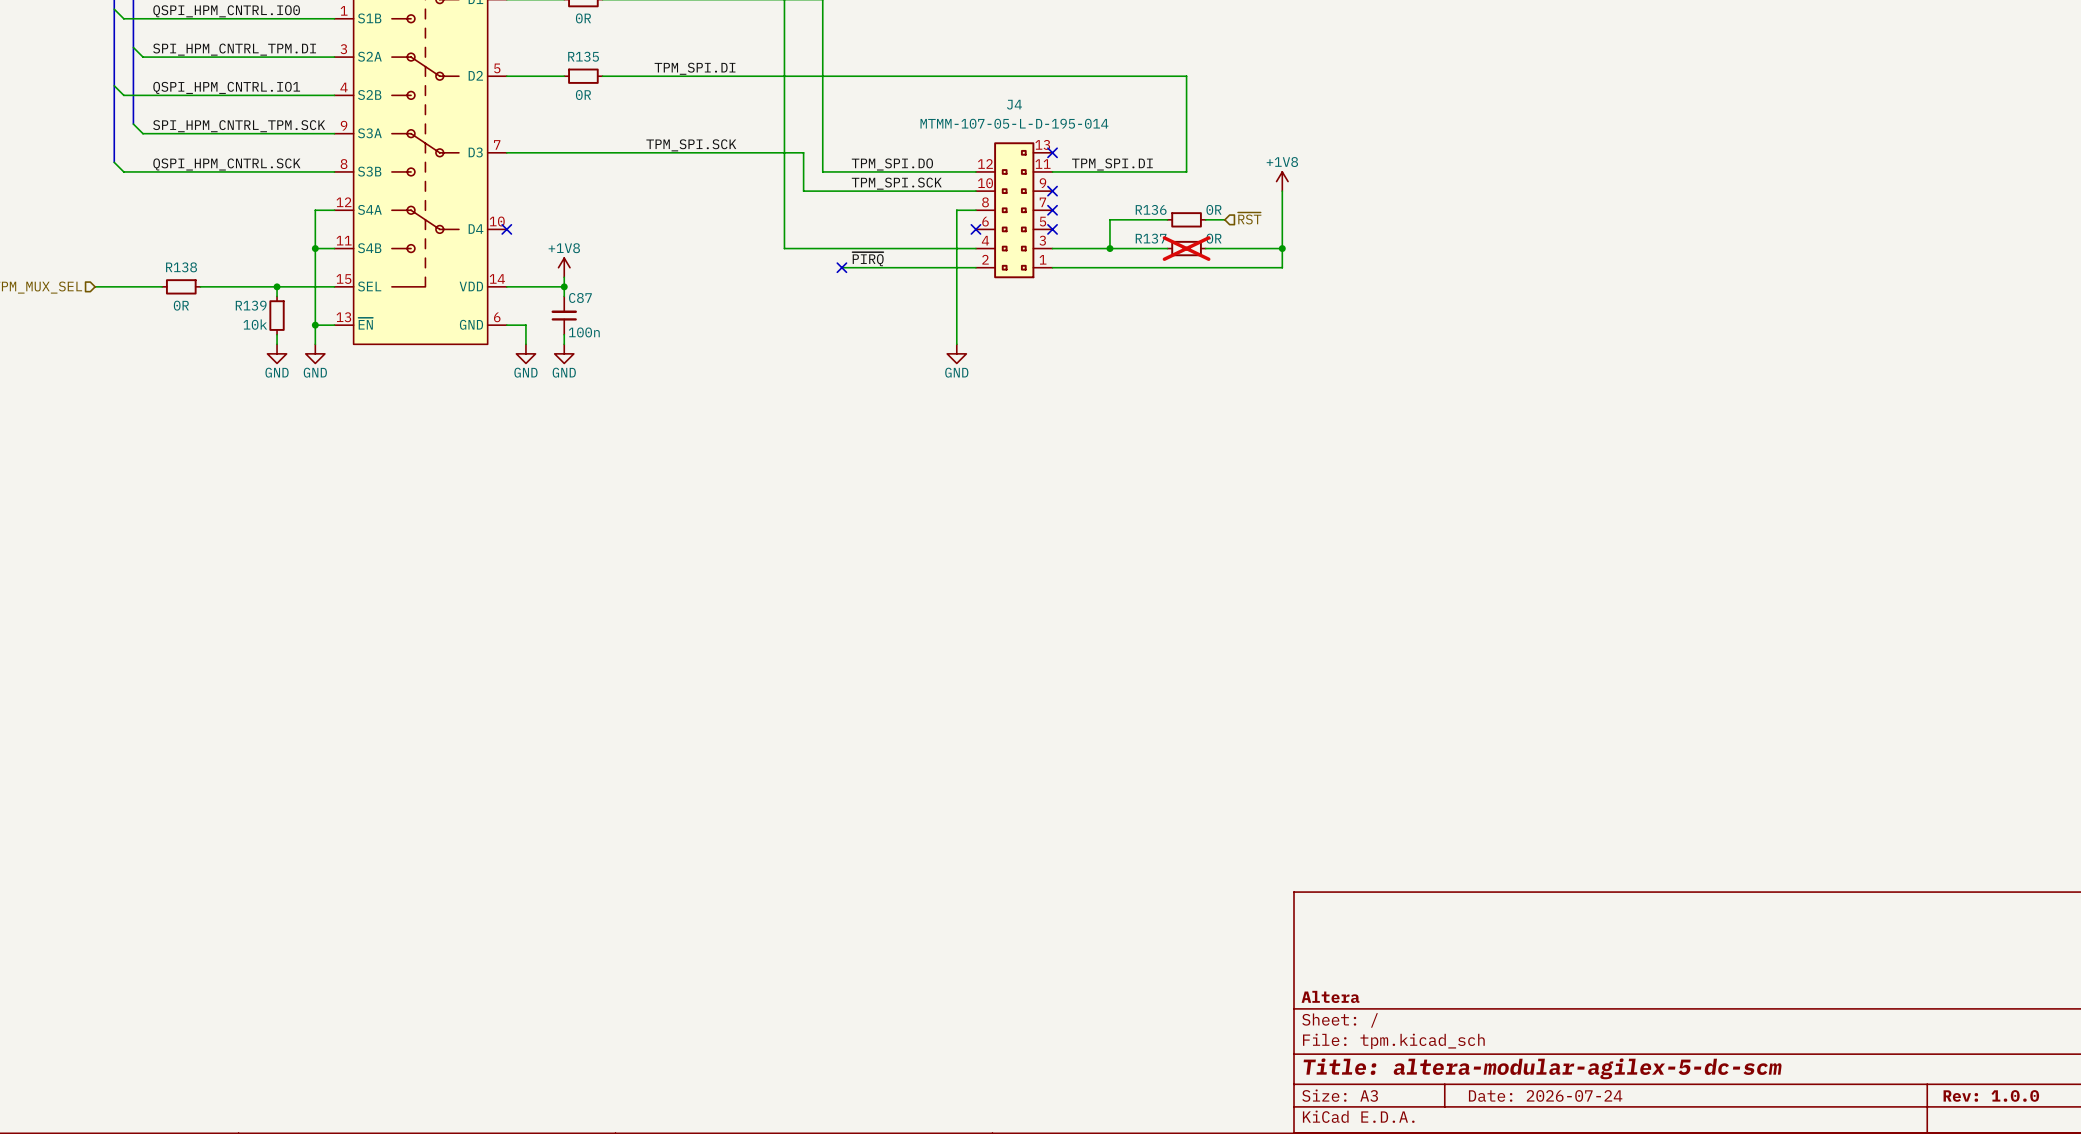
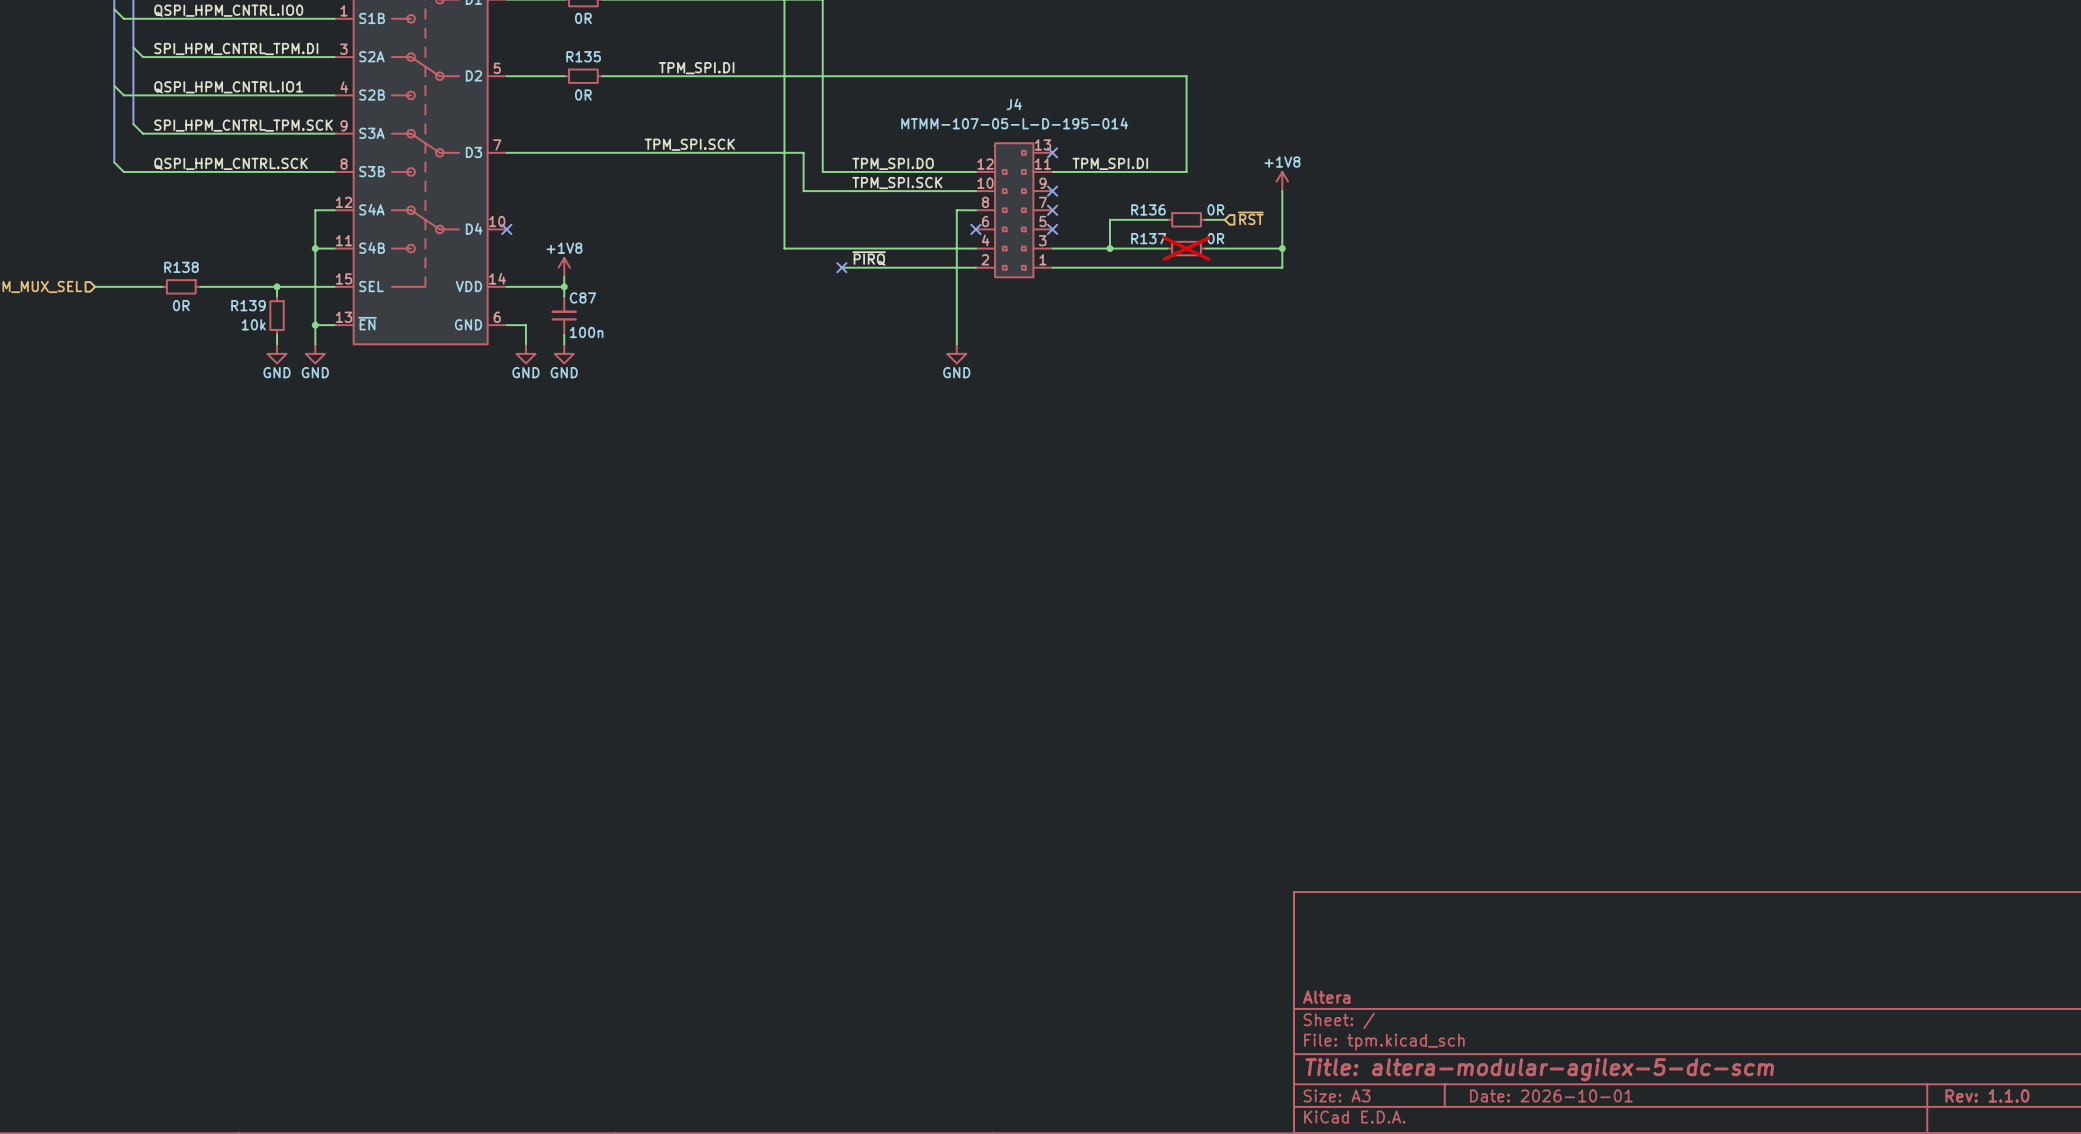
title block: Date: 2026-07-24 (1545, 1095) -> Date: 2026-10-01 (1551, 1095)
title block: Rev: 1.0.0 (1991, 1095) -> Rev: 1.1.0 (1987, 1095)

